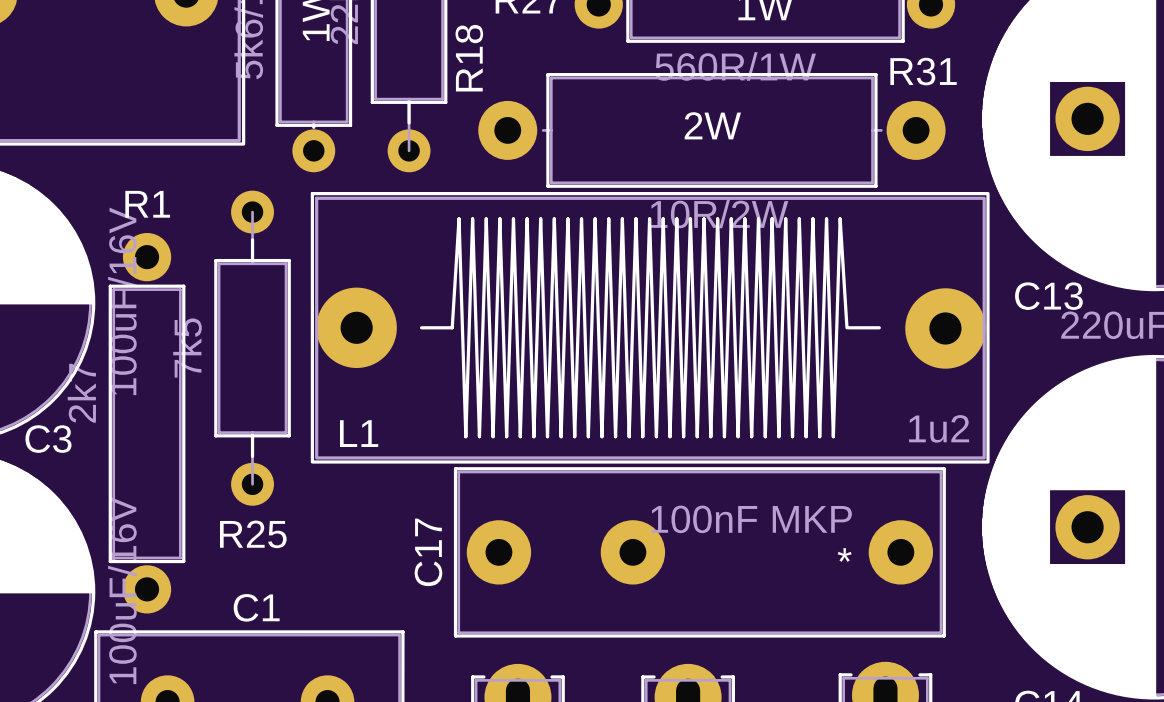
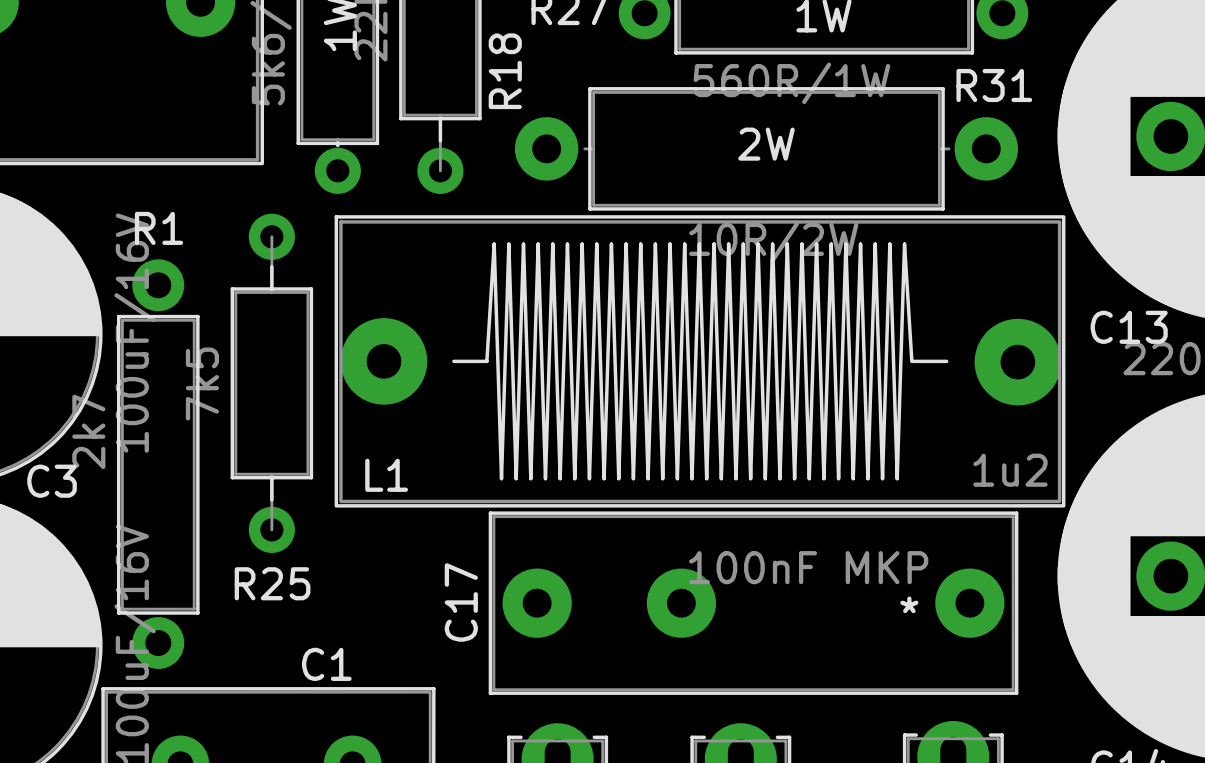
C1 name position: C1 (256, 607) -> C1 (326, 664)

